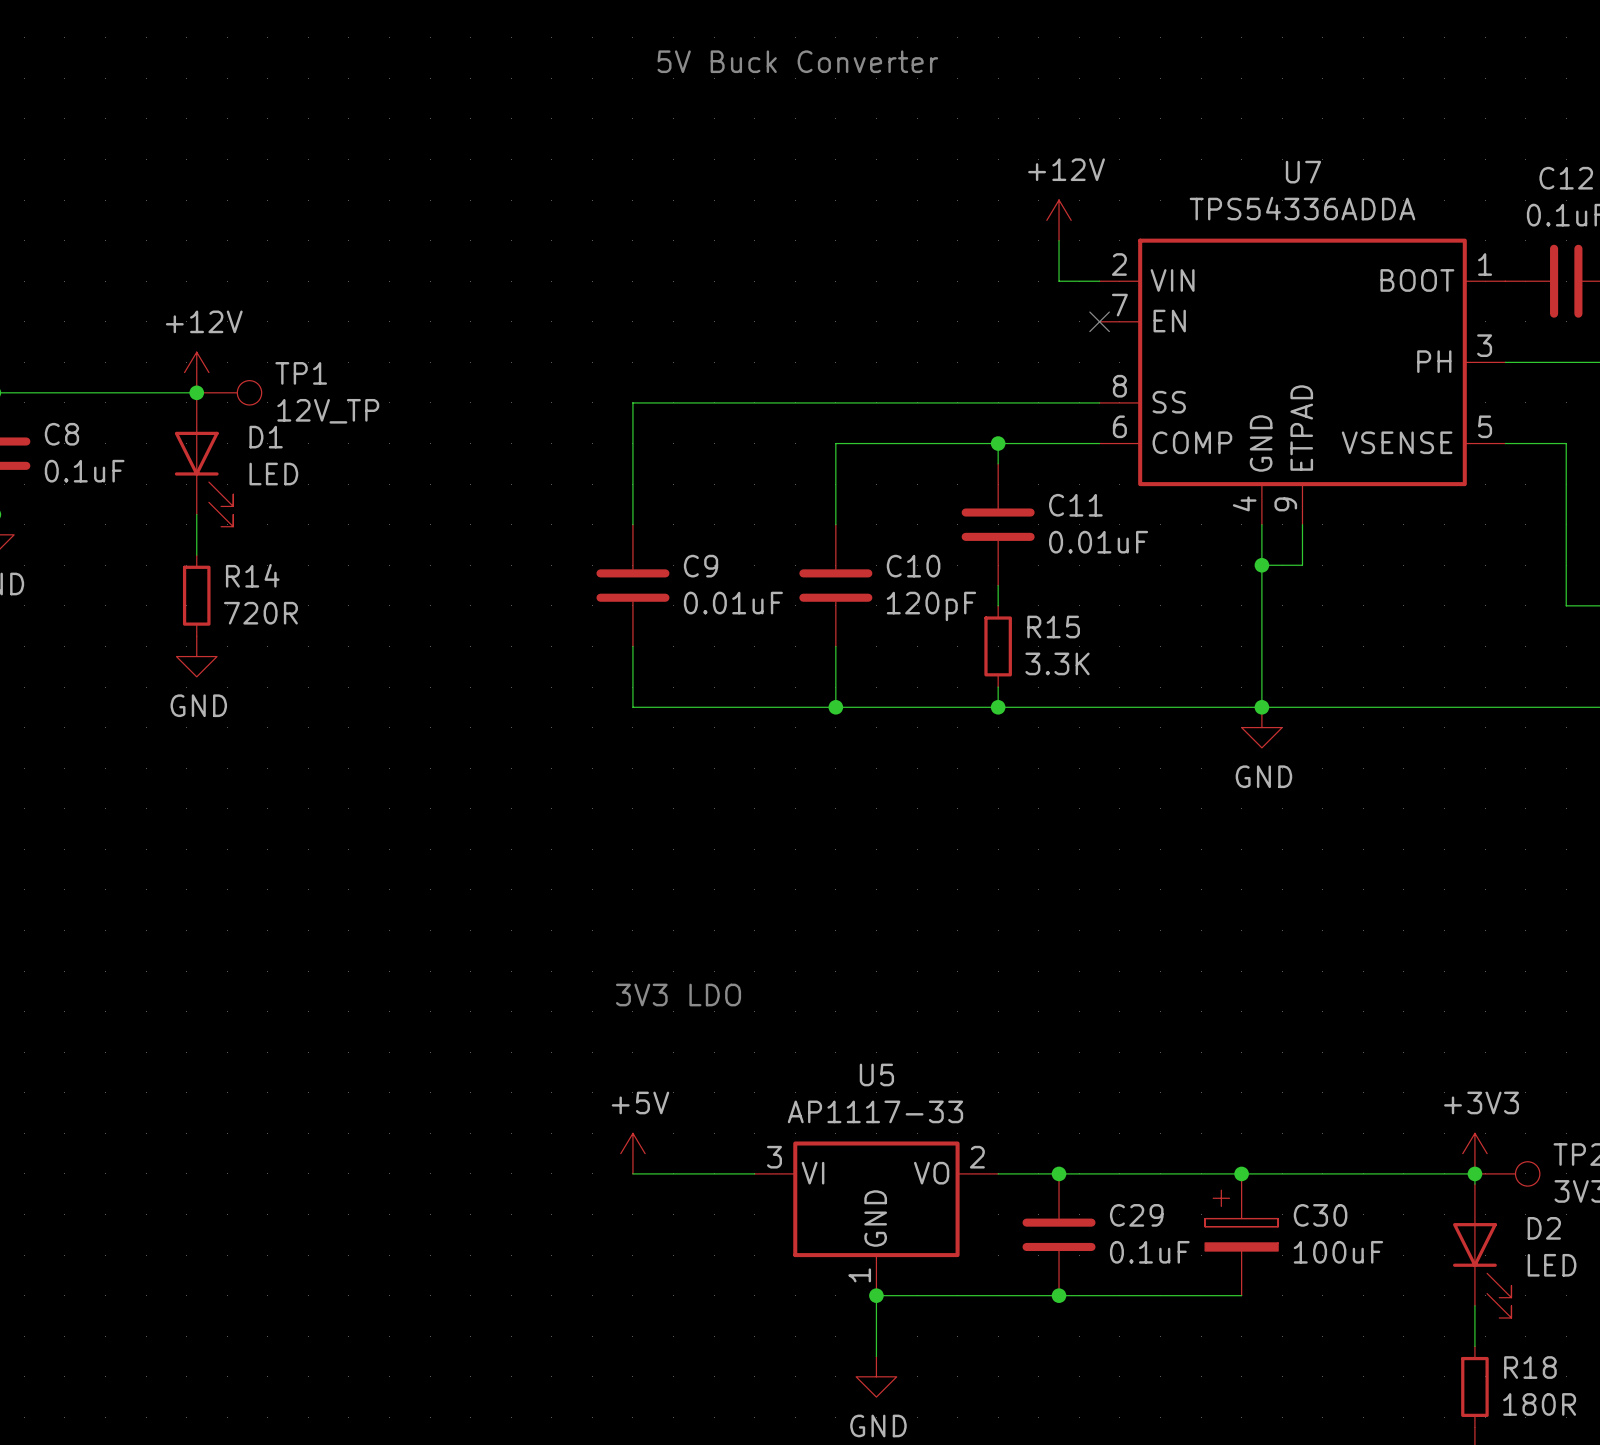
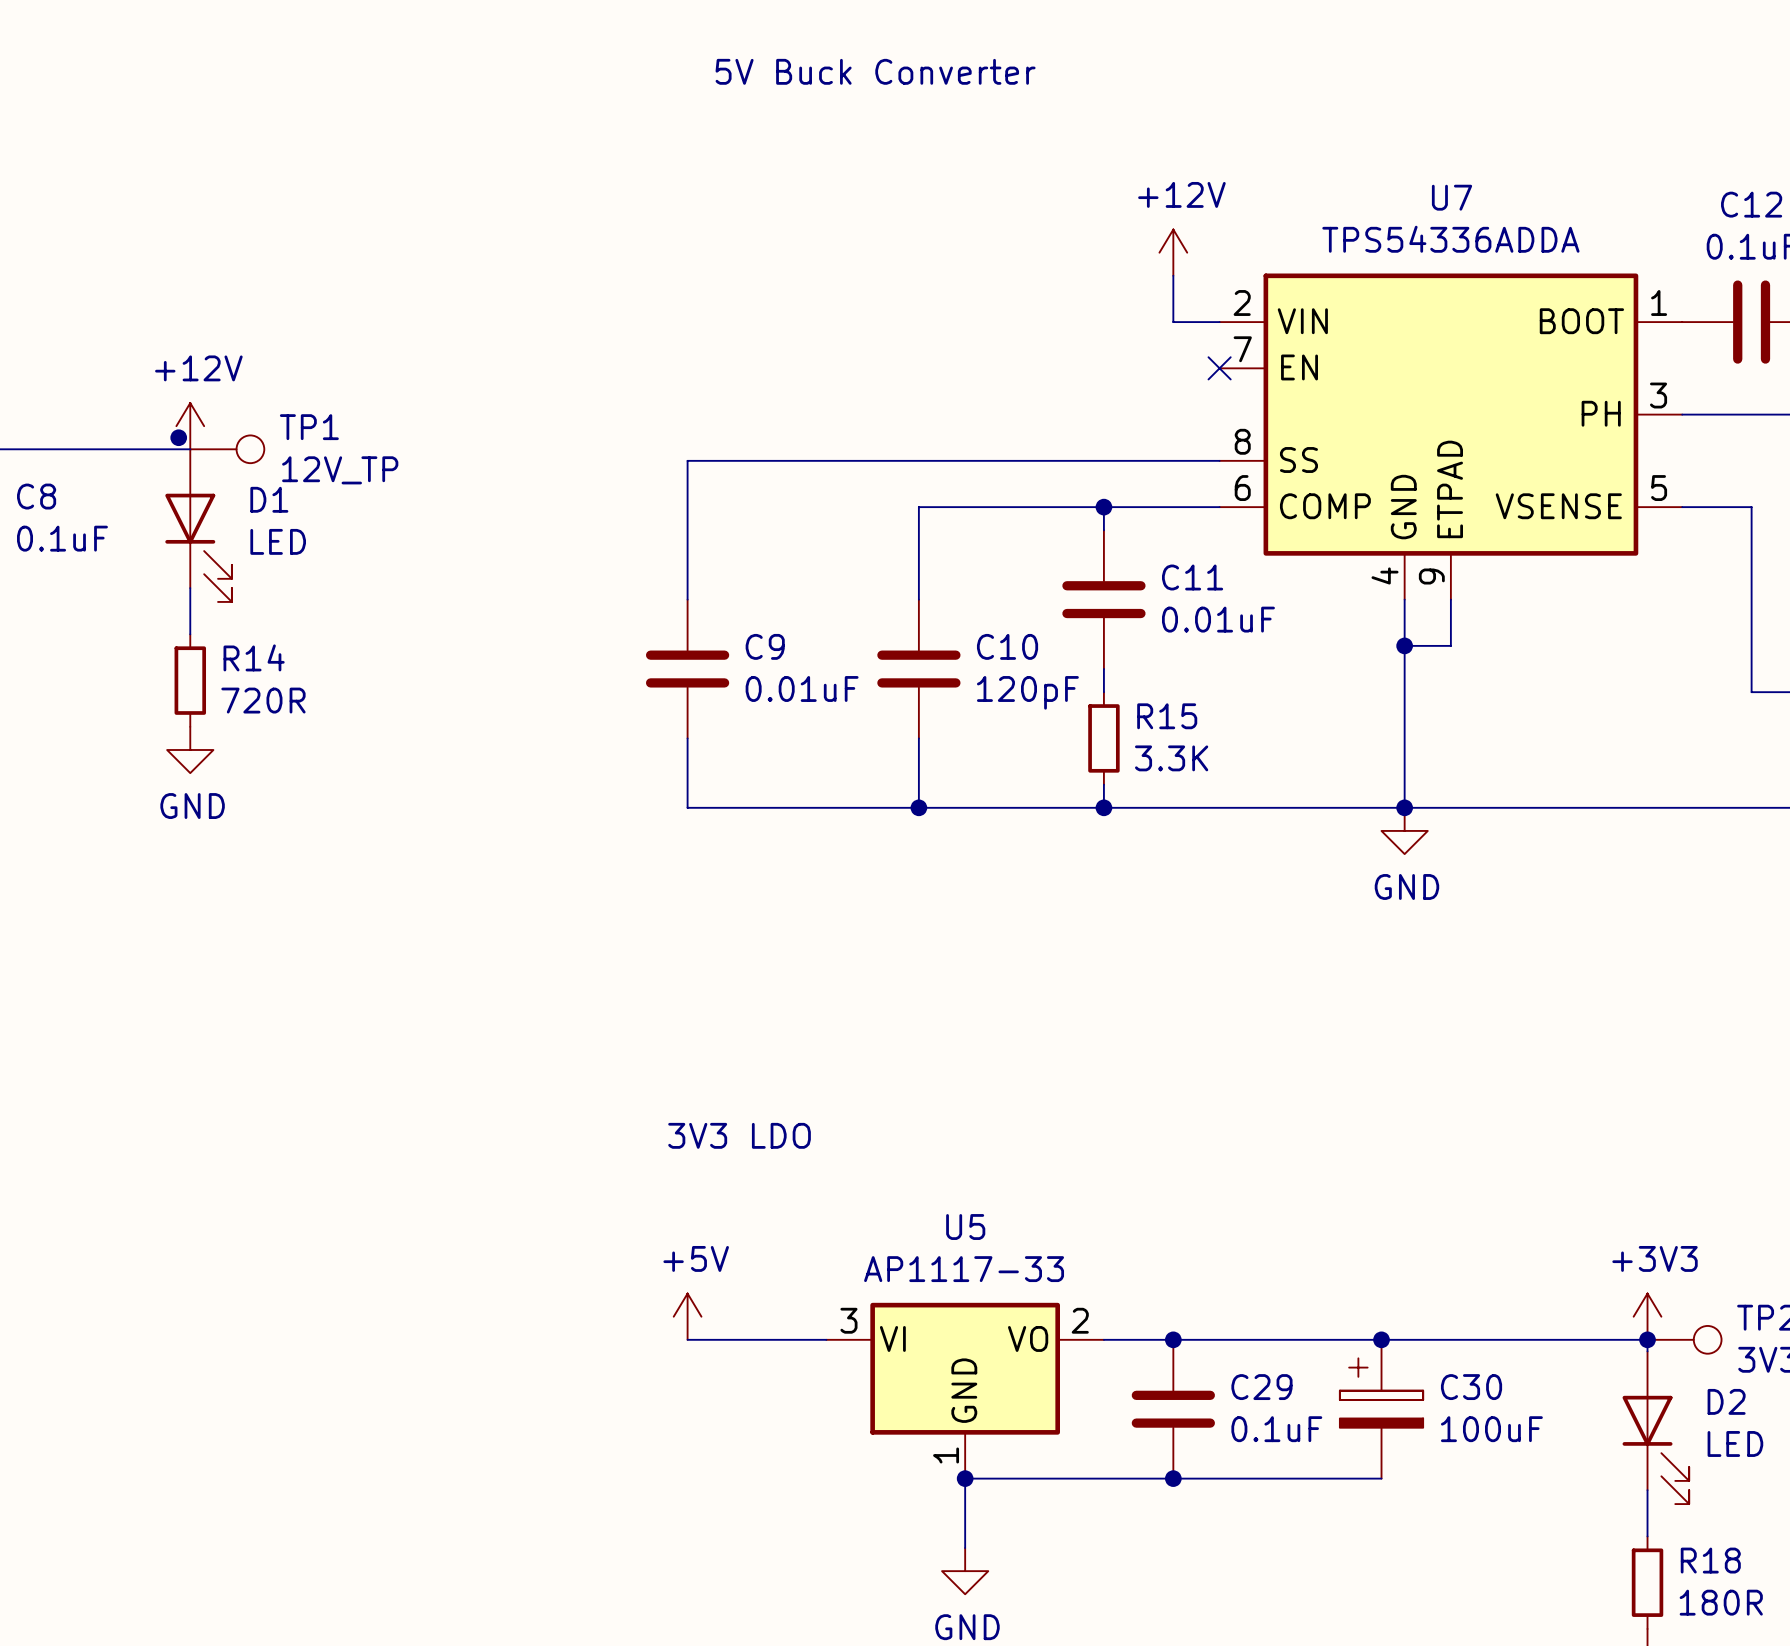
junction position: (196, 392) -> (178, 437)

